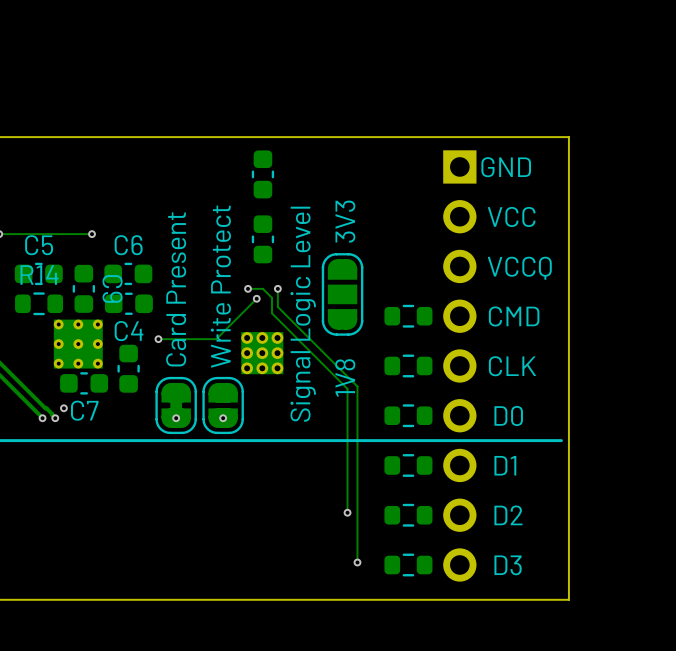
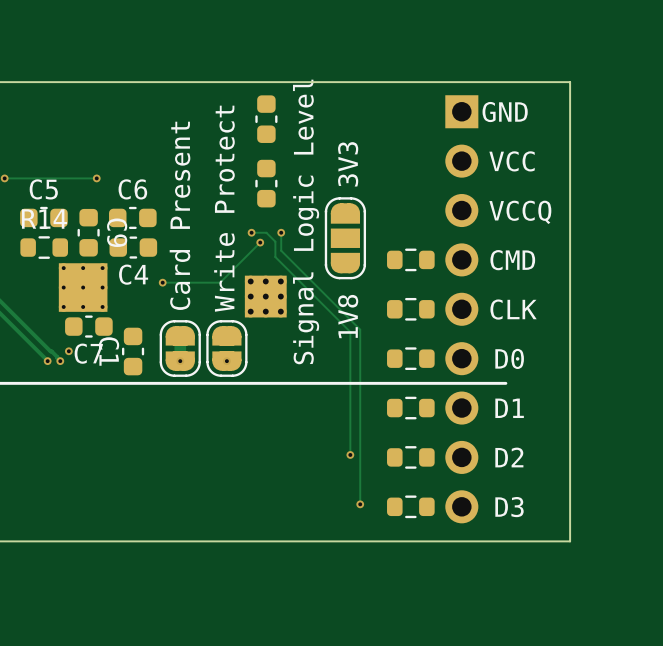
part: (128, 368) -> none
C1: none -> (133, 351)
line: (561, 440) (504, 440) -> none

